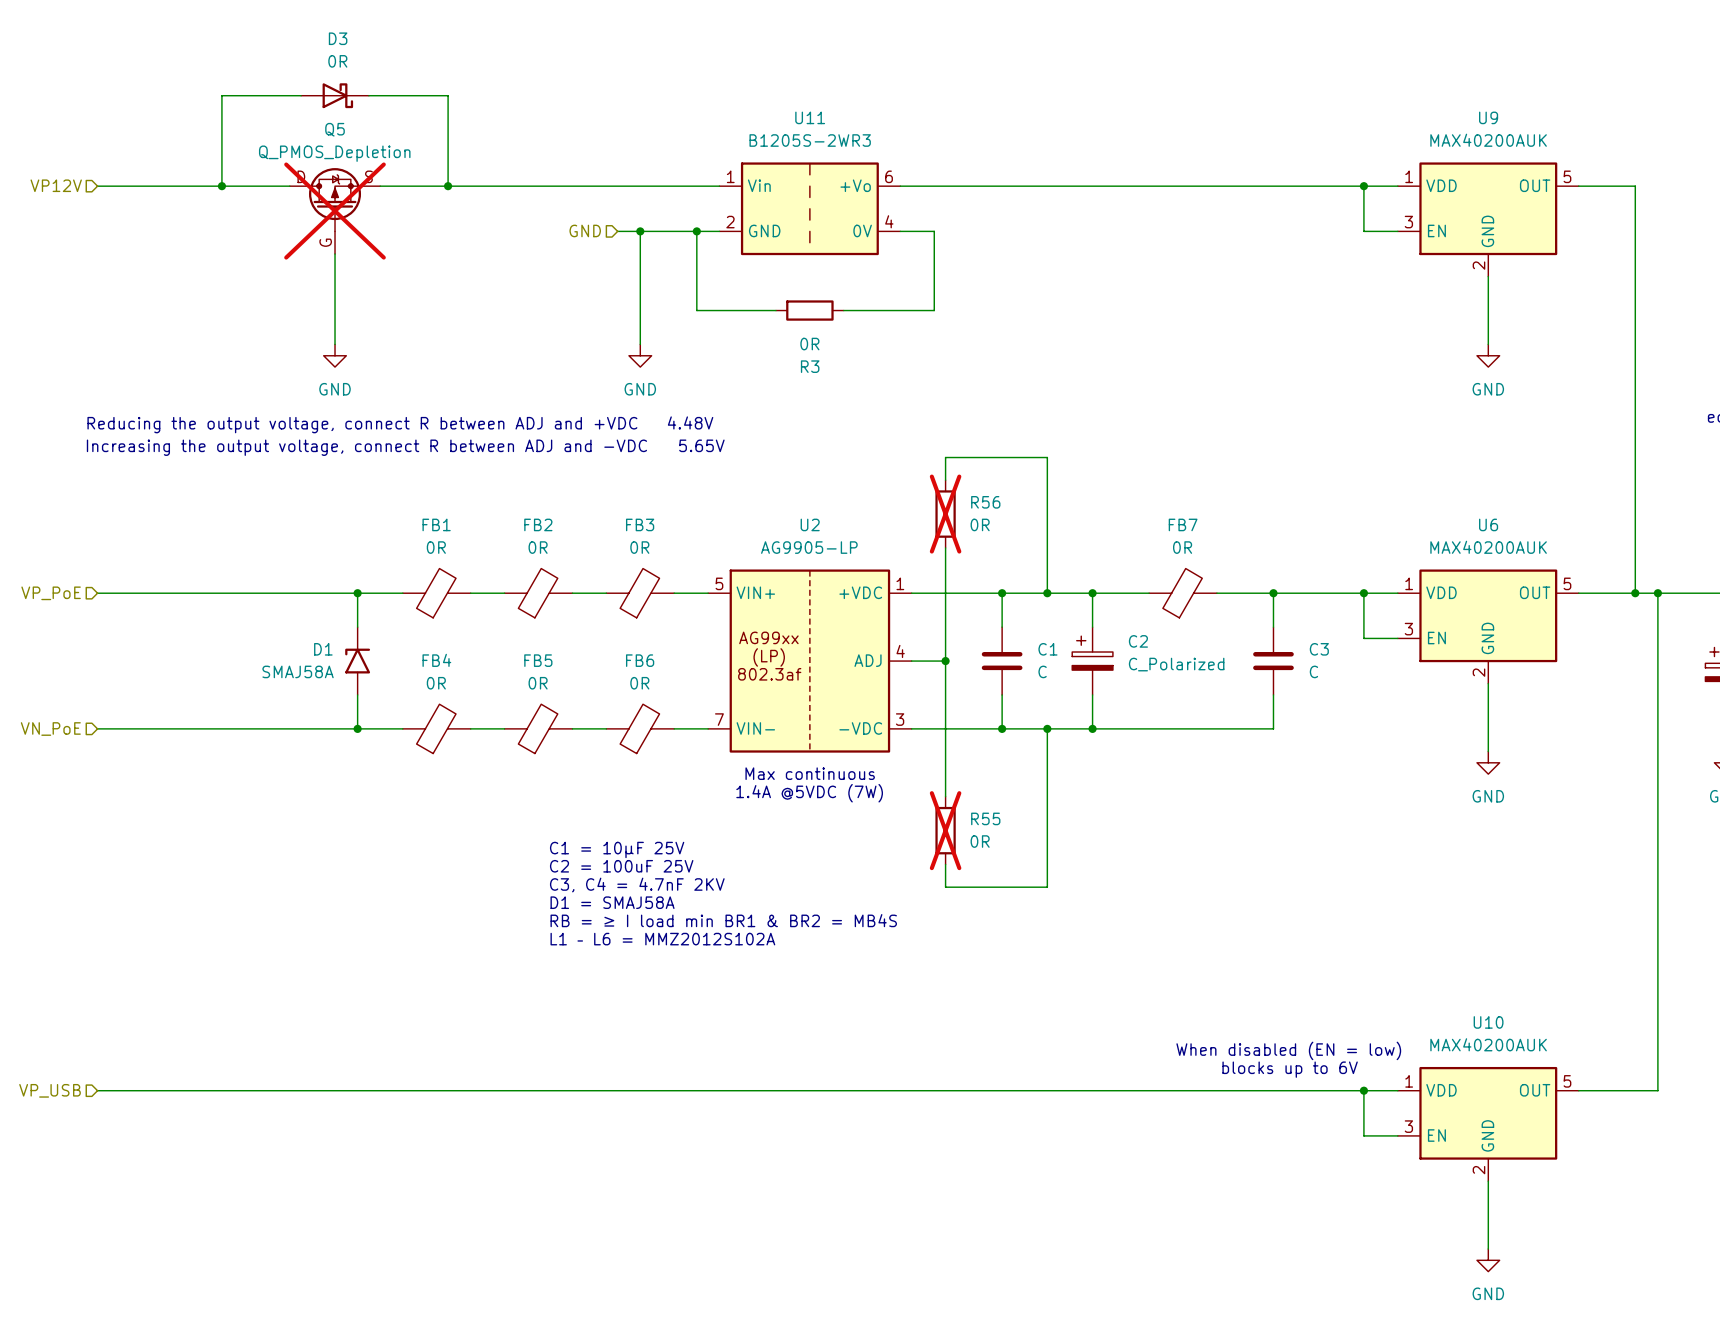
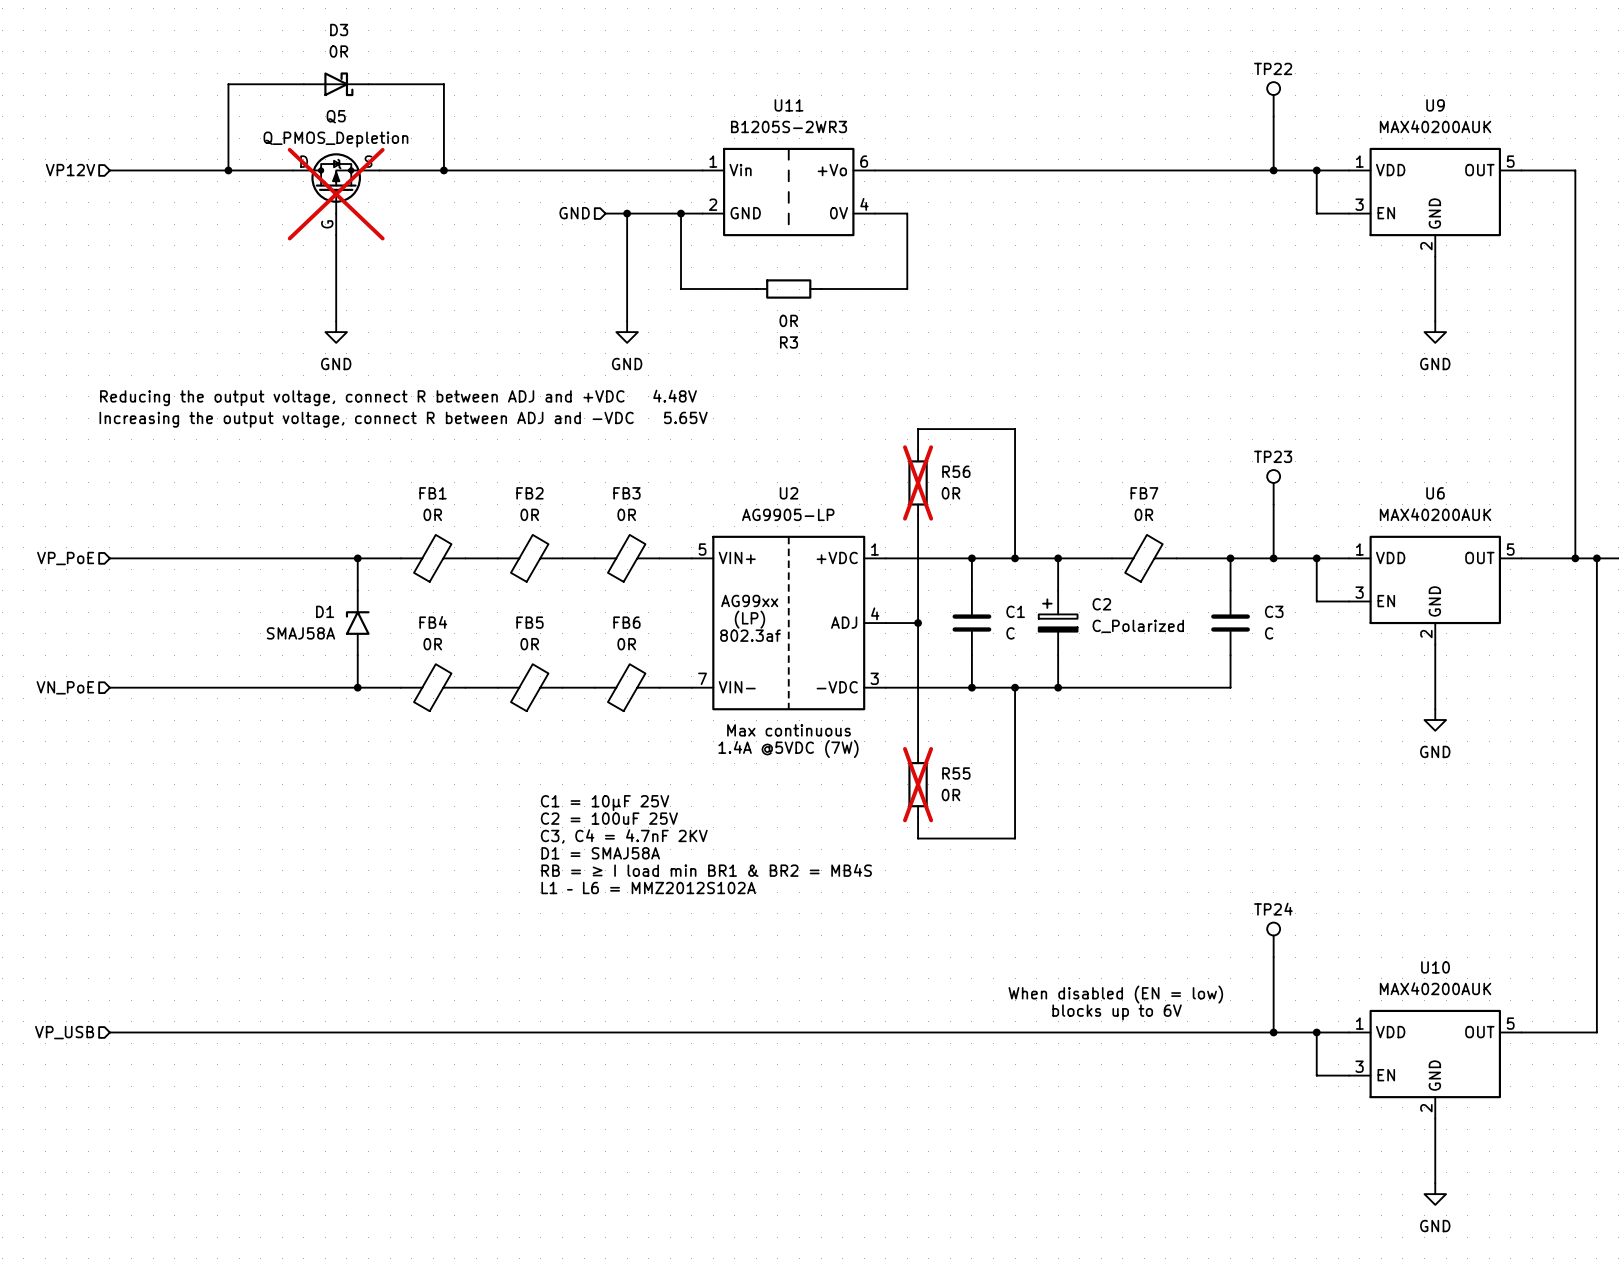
TP22: none -> (1273, 99)
wire: none -> (1273, 116) (1273, 170)
junction: none -> (1273, 170)
TP23: none -> (1273, 487)
wire: none -> (1273, 504) (1273, 558)
junction: none -> (1273, 558)
TP24: none -> (1273, 939)
wire: none -> (1273, 957) (1273, 1032)
text position: When disabled (EN = low) (1288, 1050) -> When disabled (EN = low) (1115, 994)
text position: blocks up to 6V (1290, 1069) -> blocks up to 6V (1117, 1012)
junction: none -> (1273, 1032)

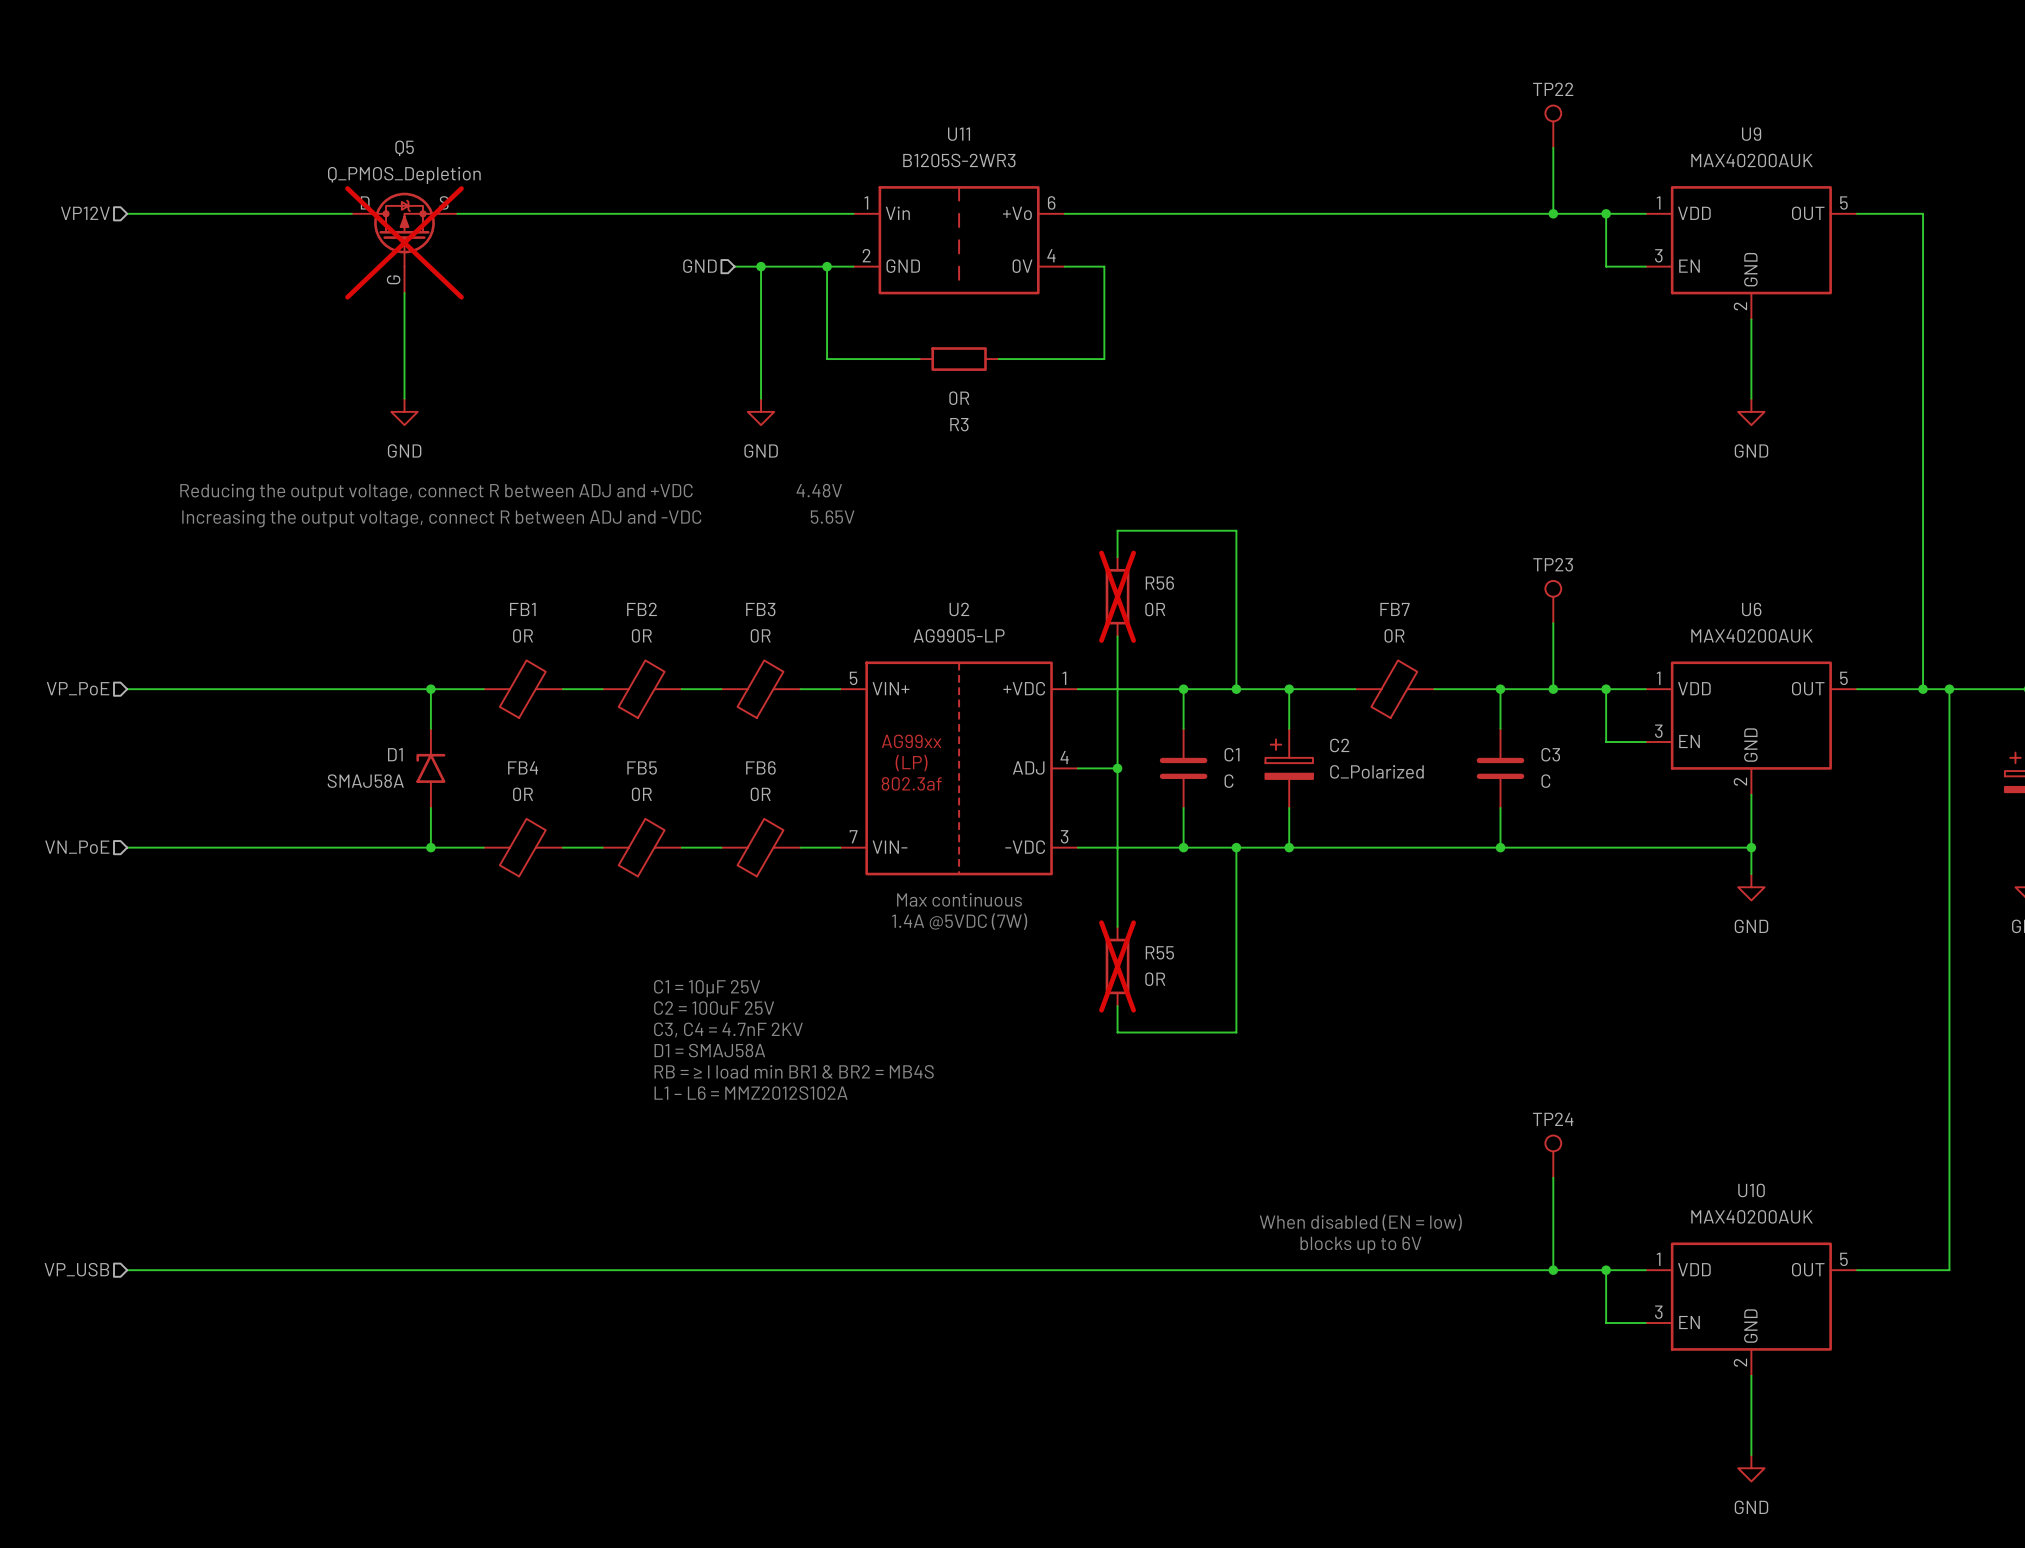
wire: (303, 84) (228, 84) (228, 170) -> none
D3: 0R (336, 84) -> none
wire: (368, 84) (443, 84) (443, 170) -> none
junction: (228, 170) -> none
junction: (443, 170) -> none
wire: none -> (1500, 847) (1751, 847)
junction: none -> (1500, 847)
junction: none -> (1751, 847)

